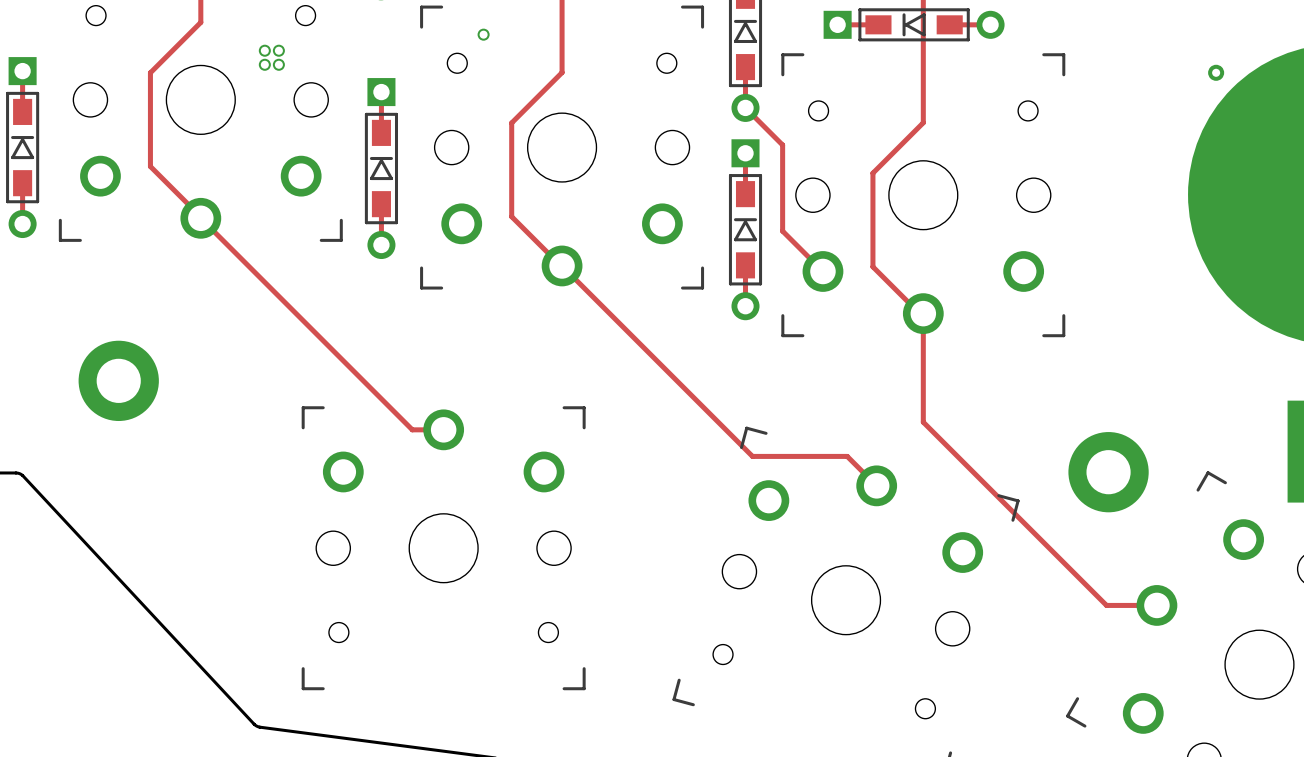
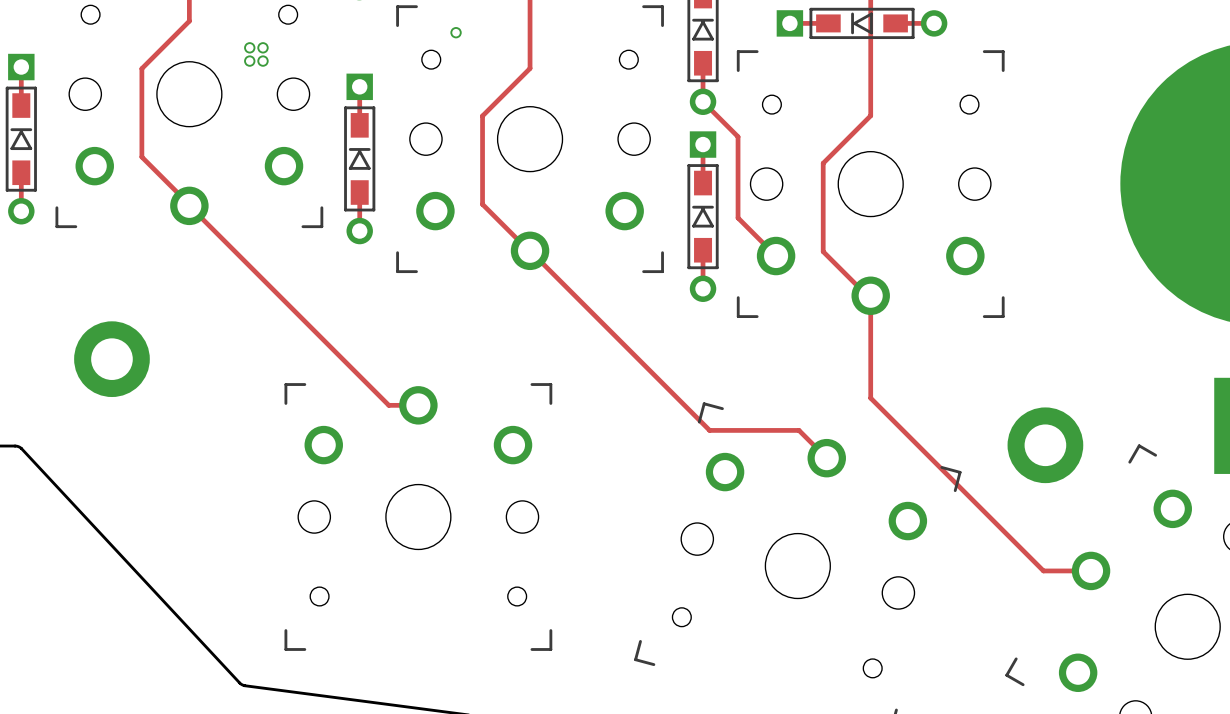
via: (1216, 72) -> none

